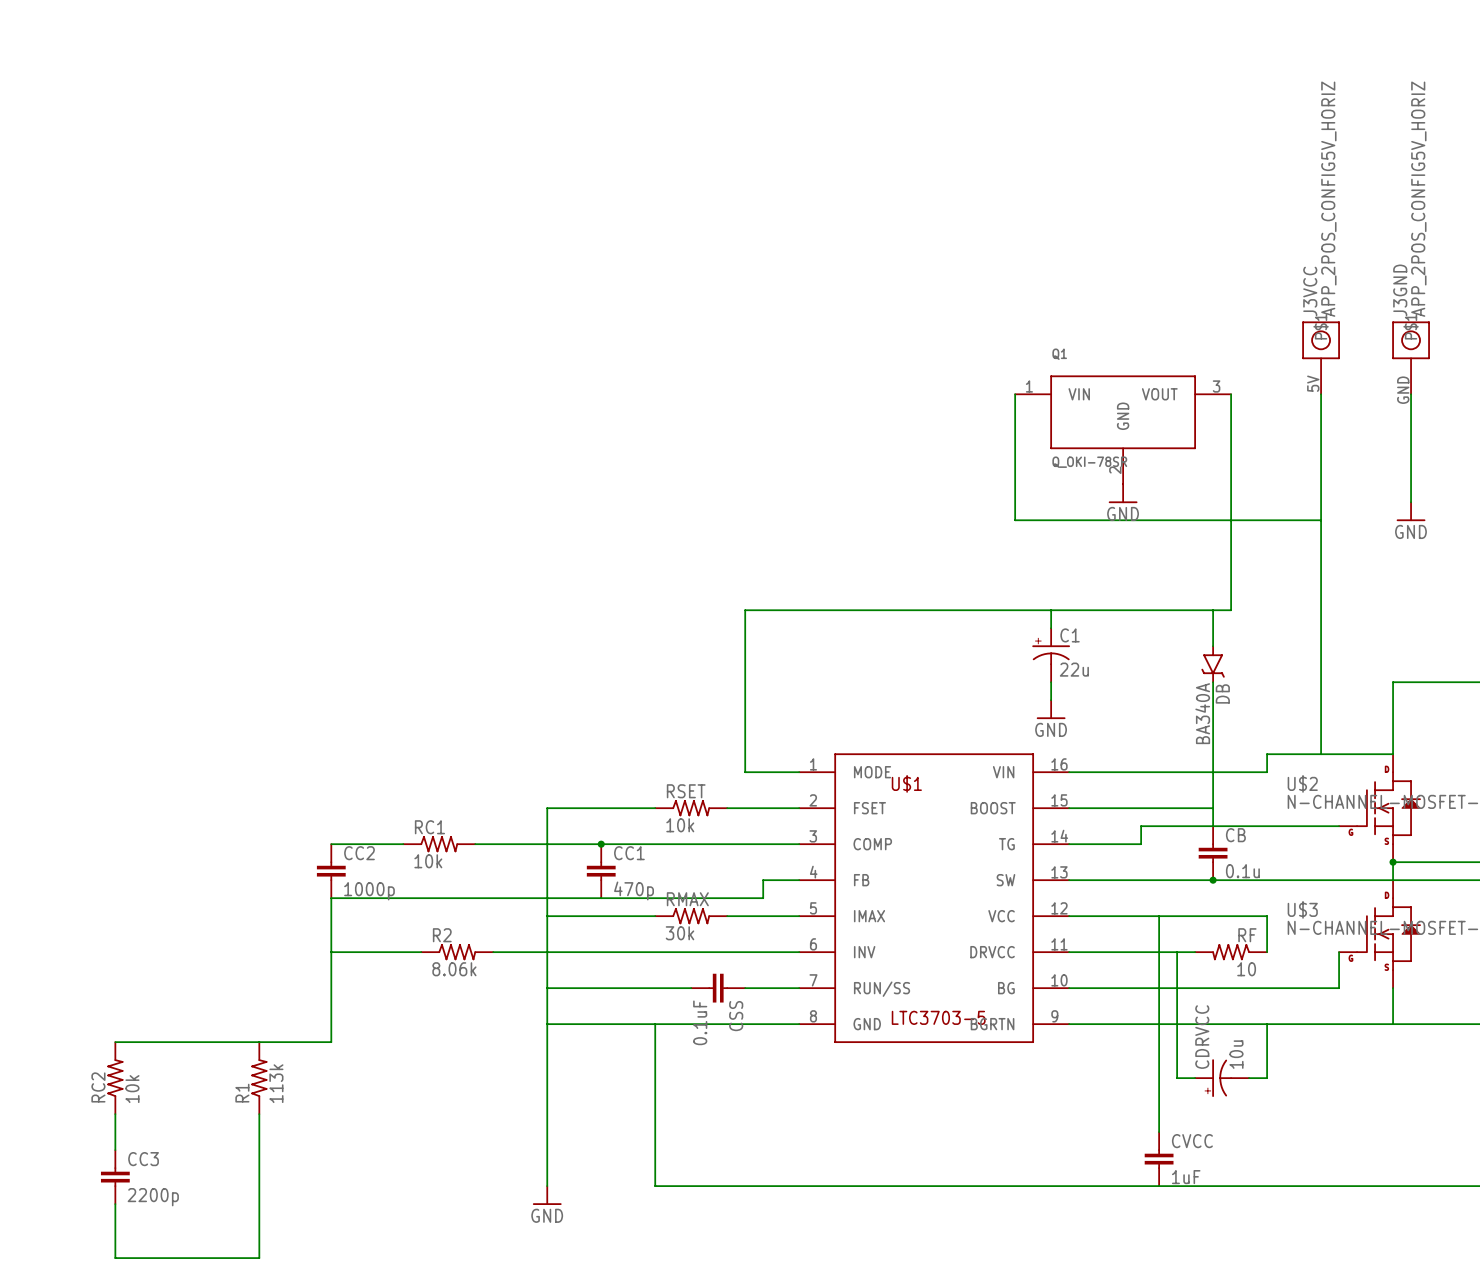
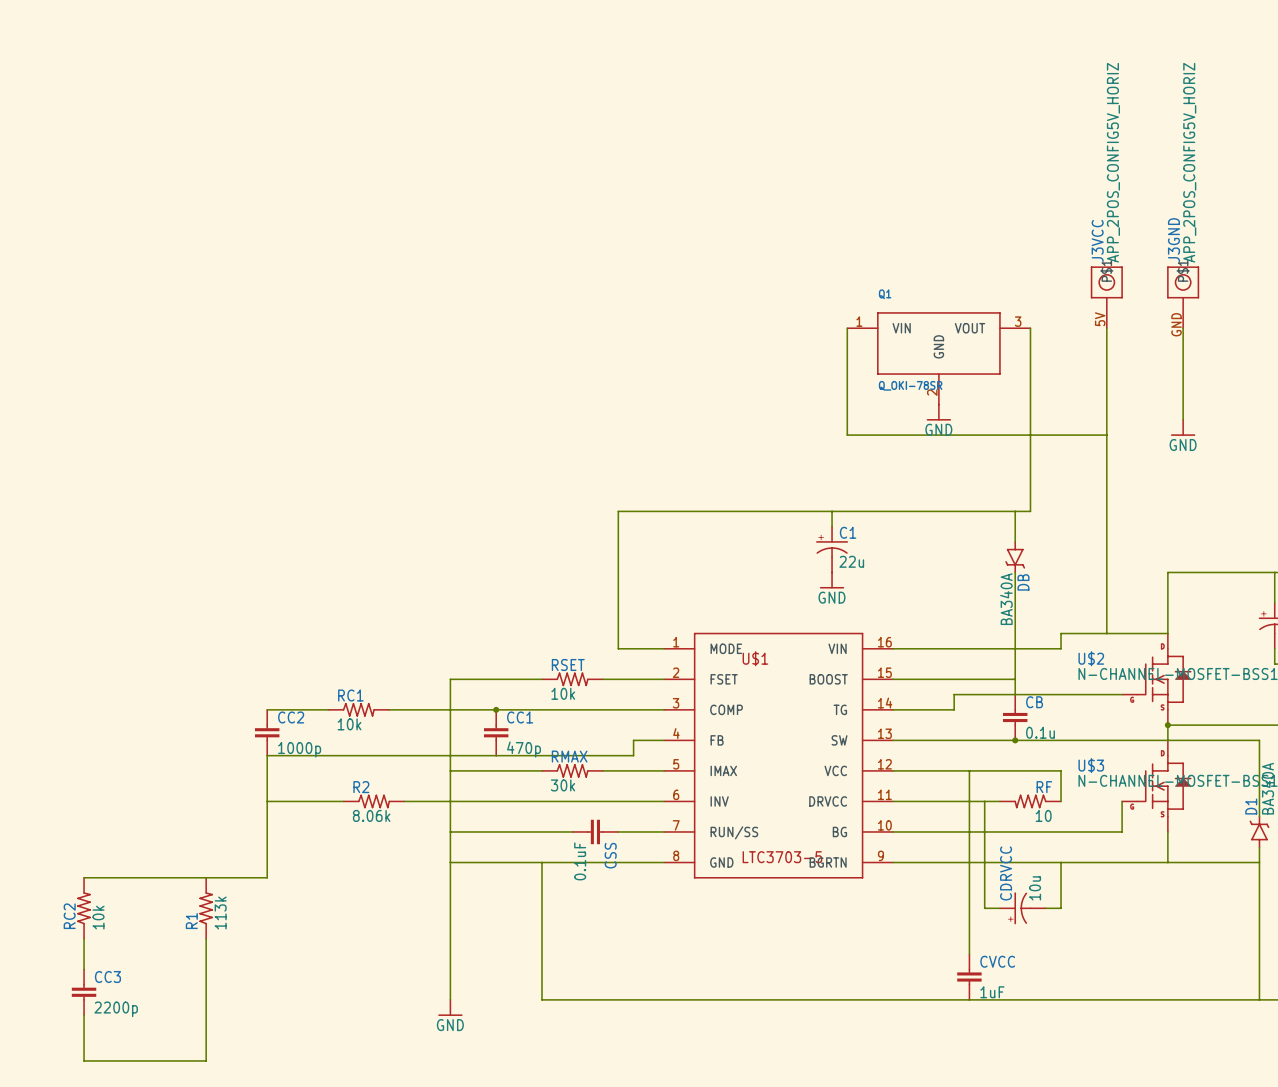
wire: (1051, 610) (1051, 628) -> (832, 511) (832, 526)
C1 position: (1051, 655) -> (832, 549)
wire: (1051, 682) (1051, 700) -> none
power symbol position: GND (1051, 709) -> GND (832, 580)

